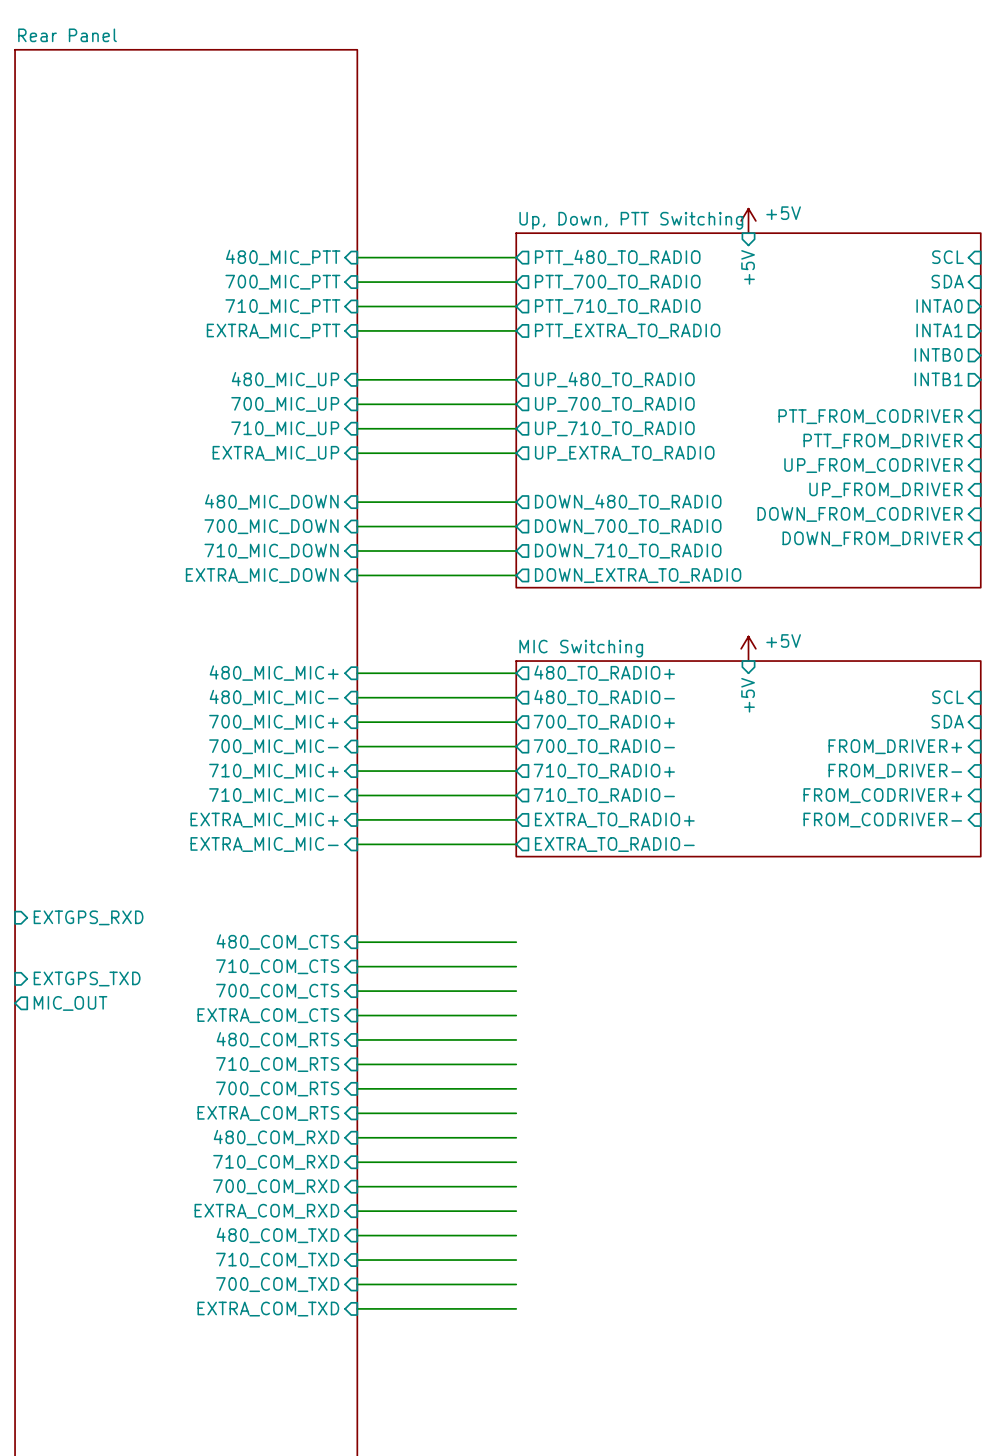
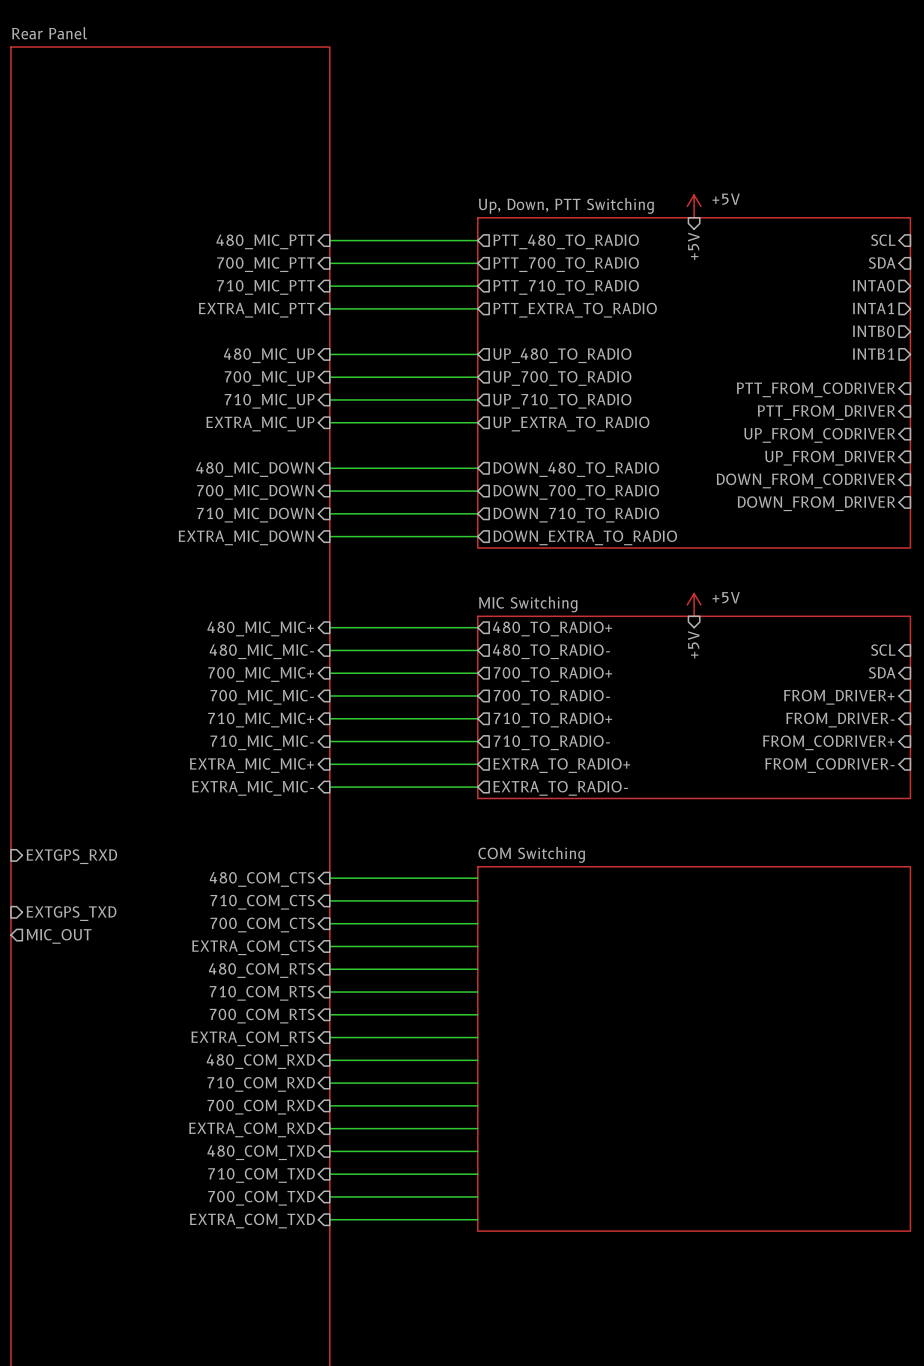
sheet COM Switching: none -> (694, 1048)

